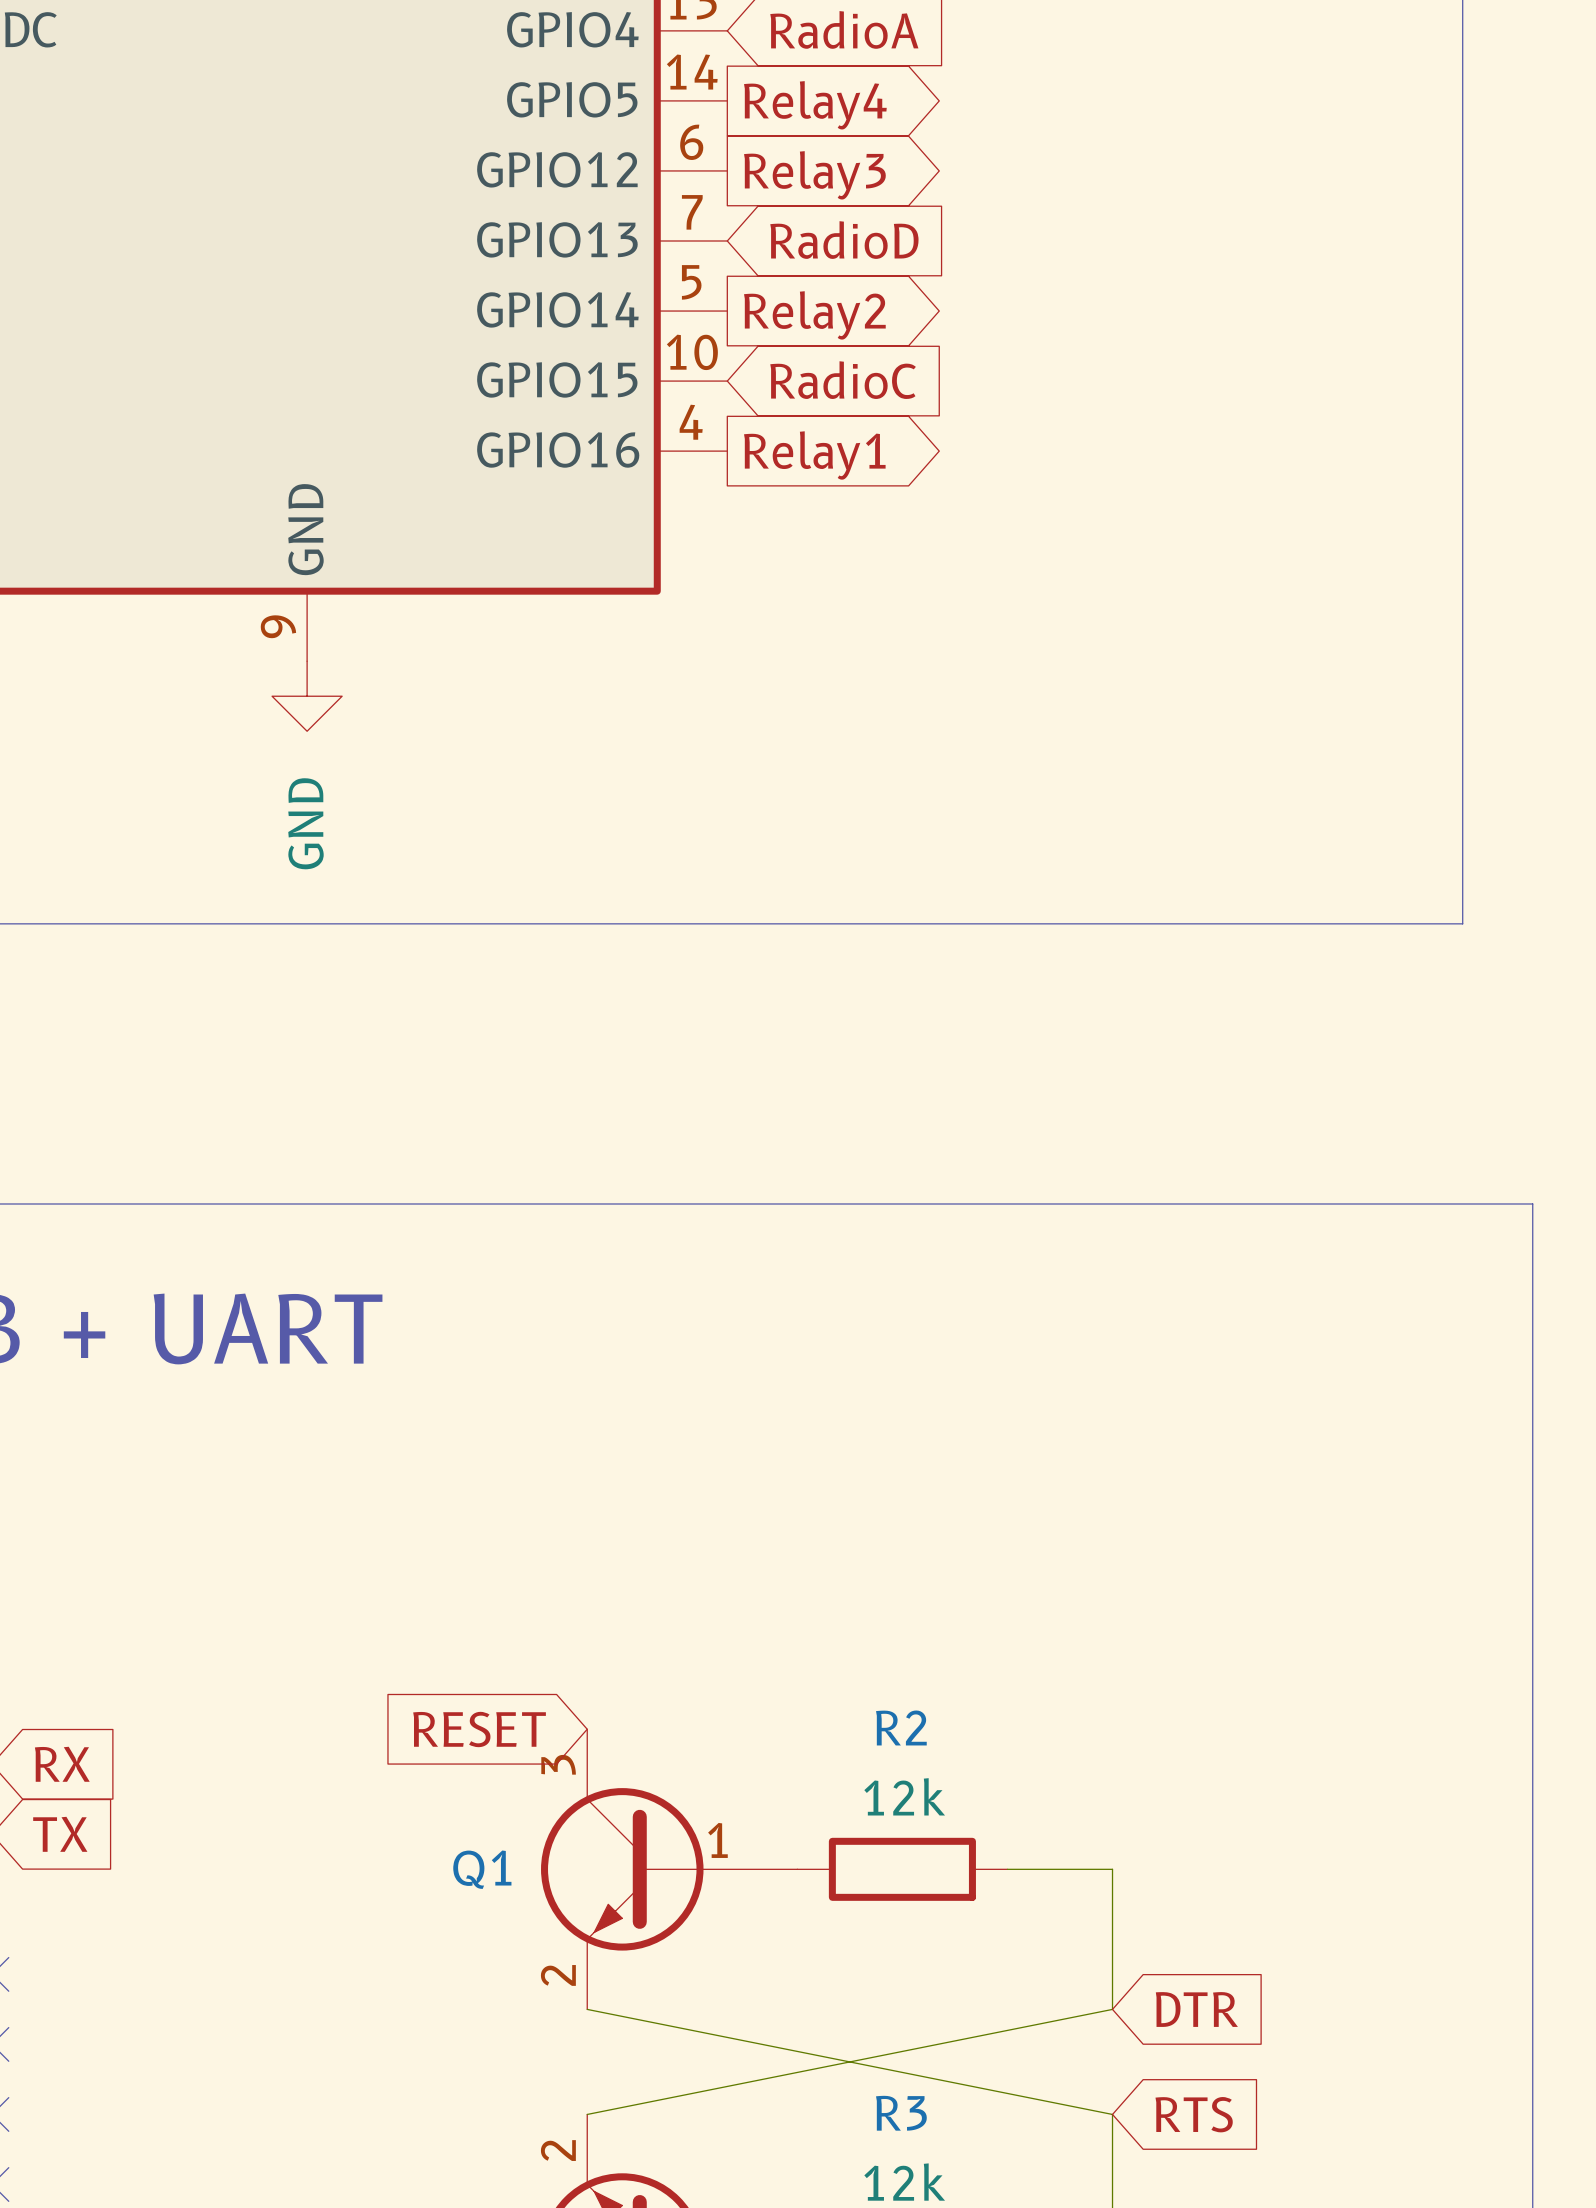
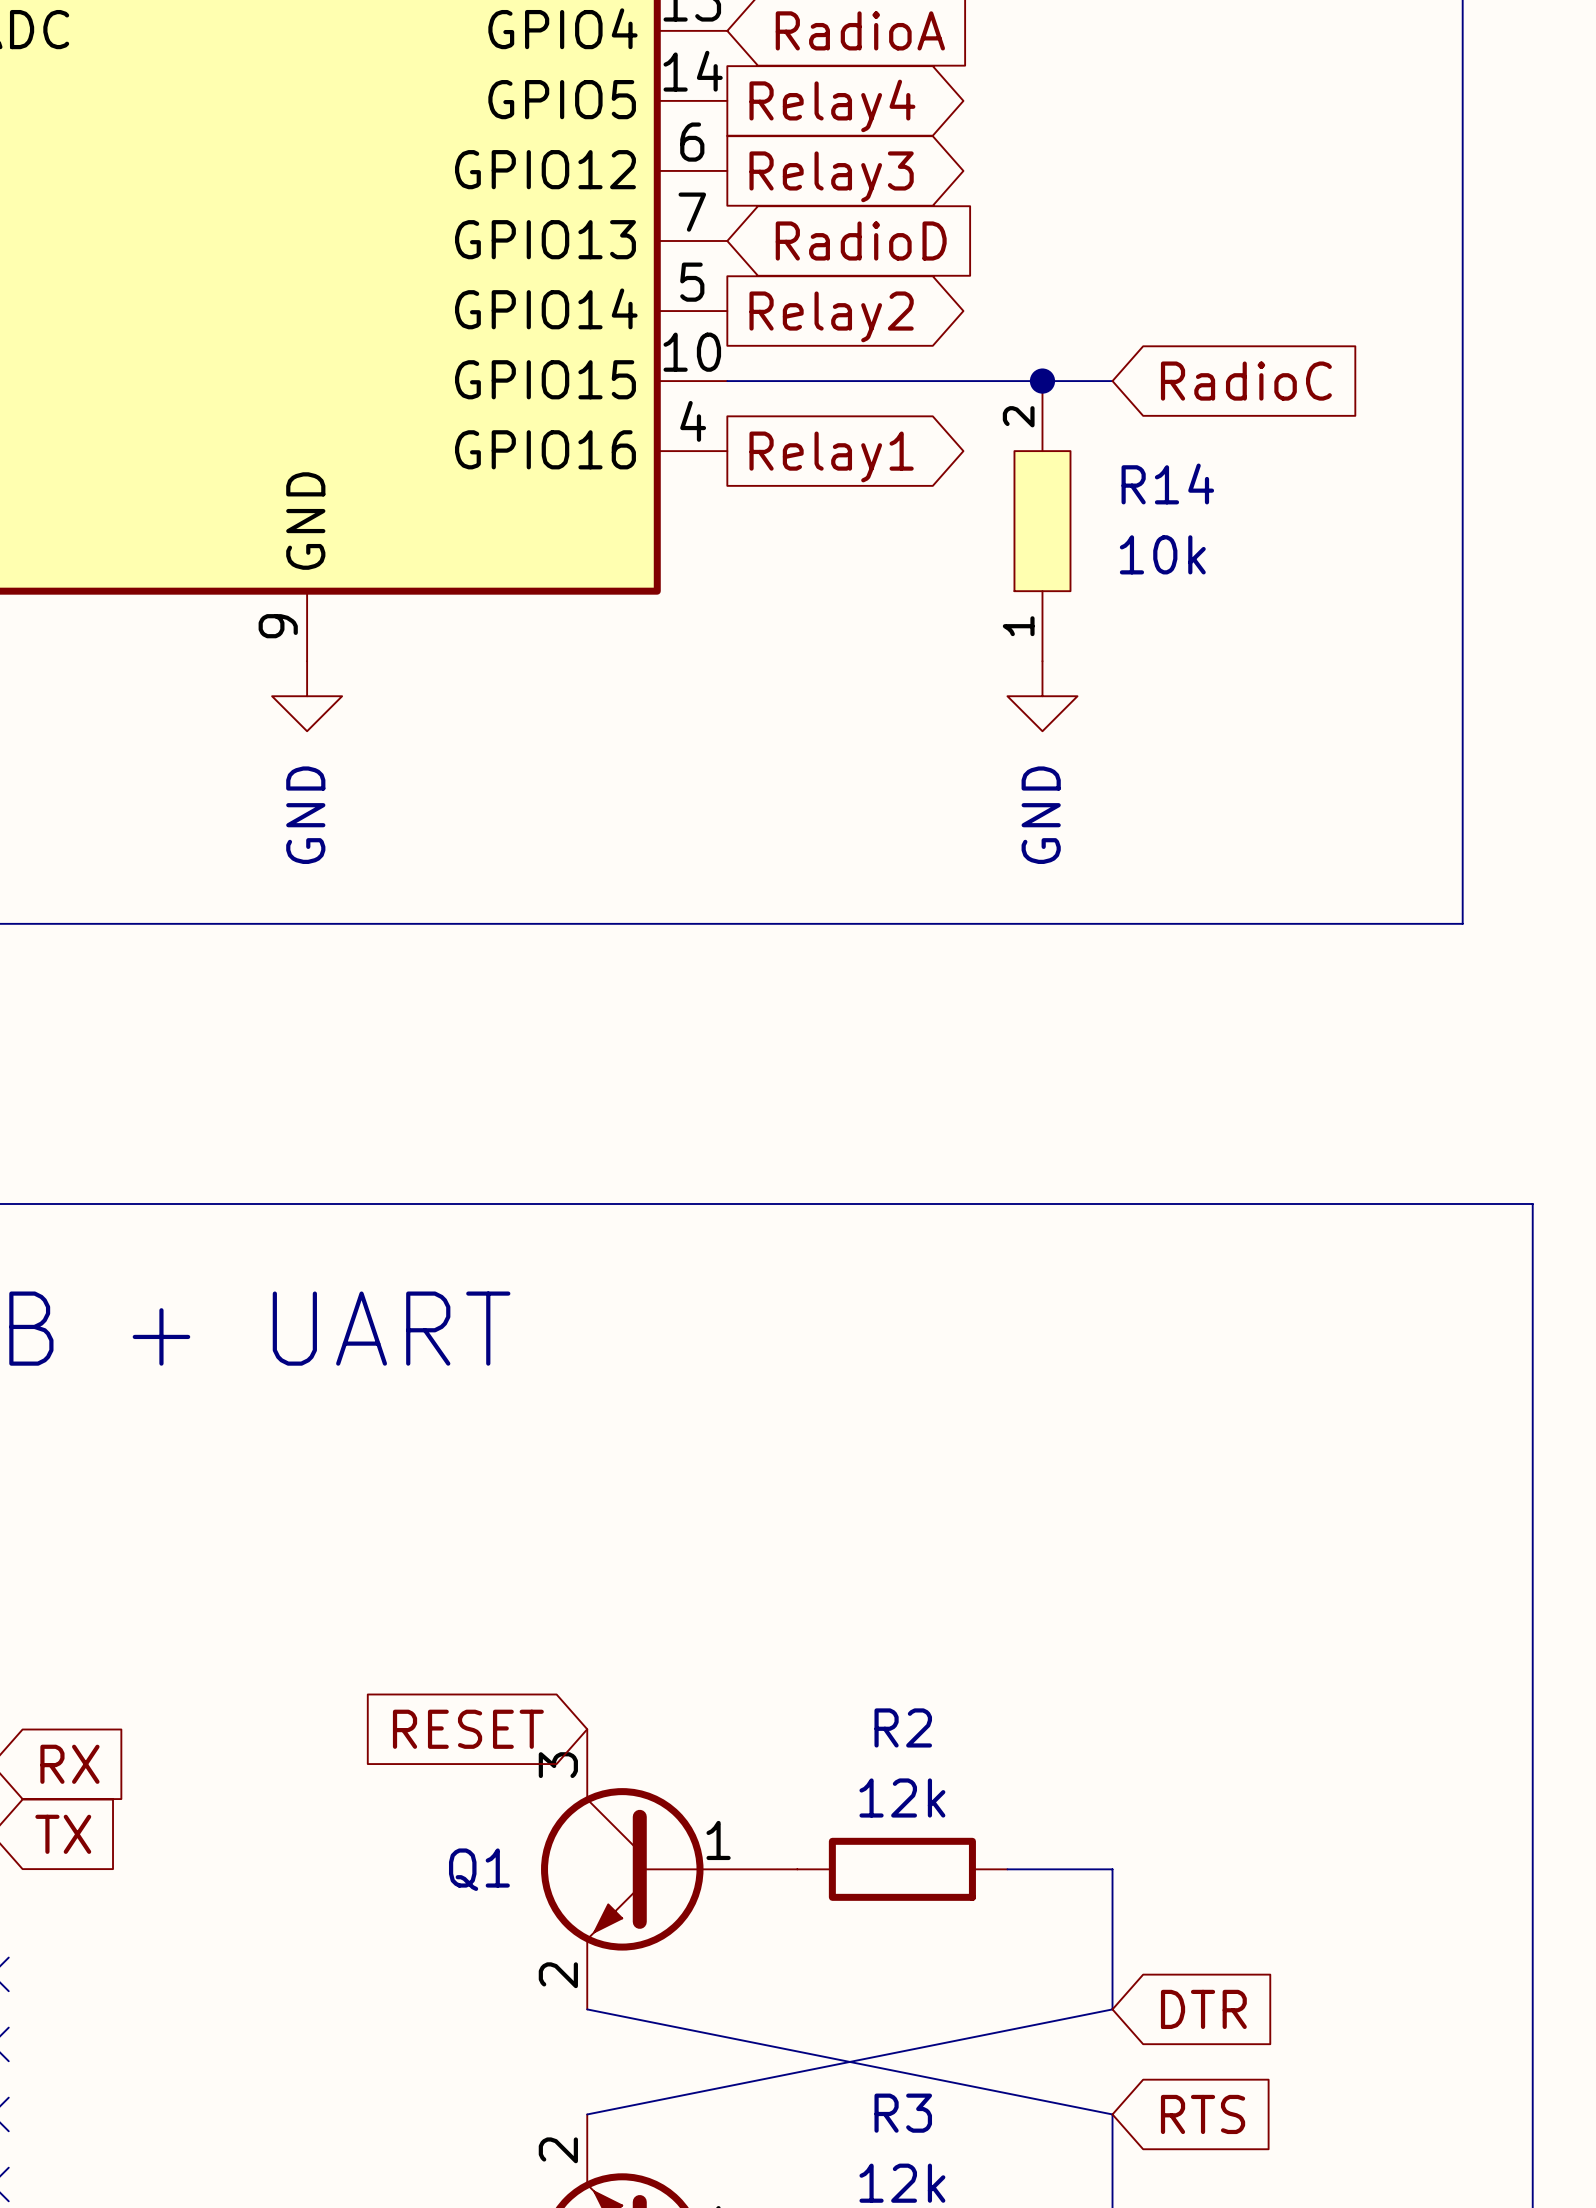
global label position: RadioC (843, 380) -> RadioC (1246, 381)
wire: none -> (727, 381) (1112, 381)
junction: none -> (1042, 381)
R14: none -> 10k (1042, 521)
power symbol: none -> GND (1042, 696)

